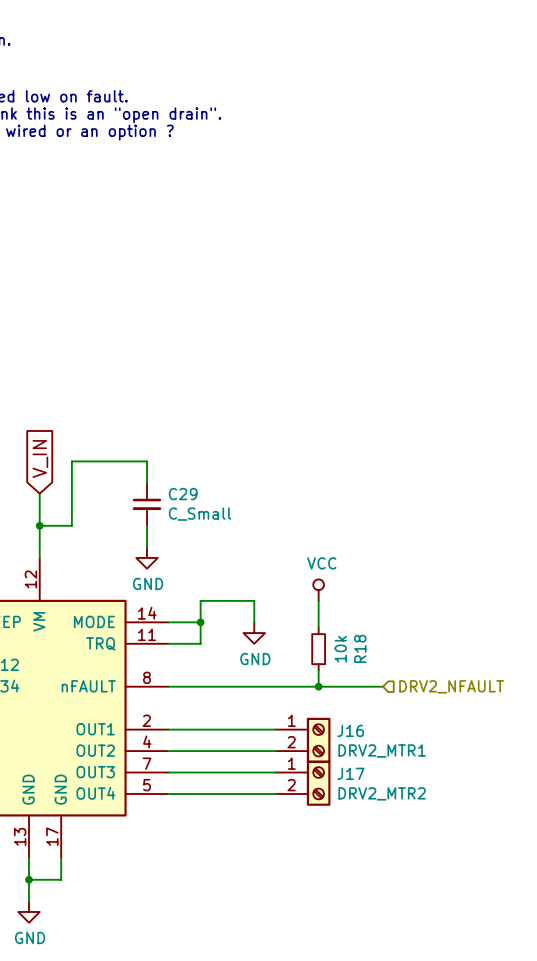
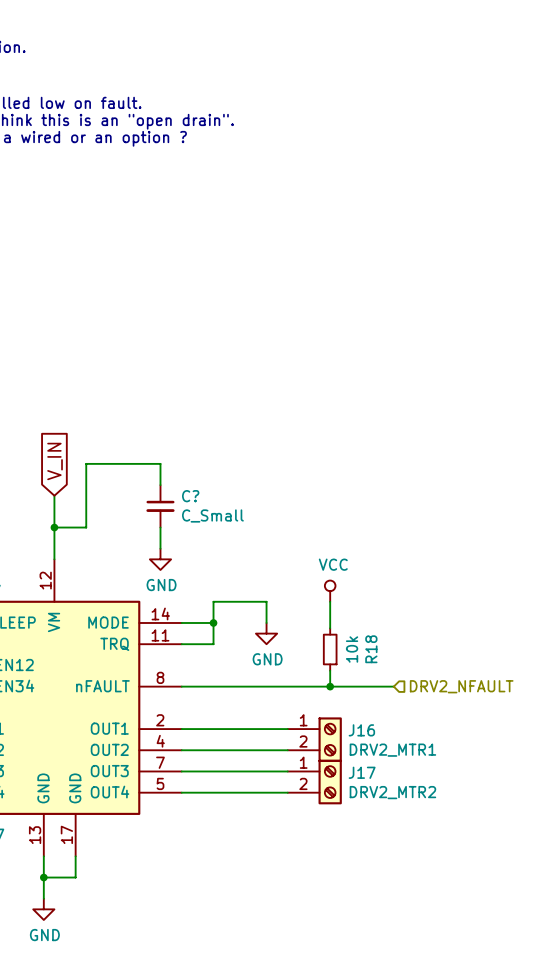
C29 name: C29 (183, 494) -> C? (190, 496)

